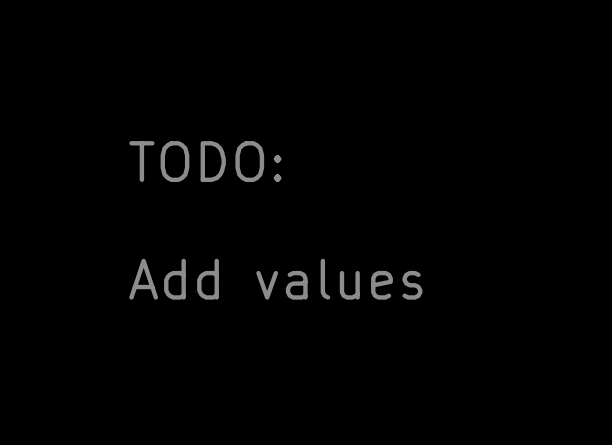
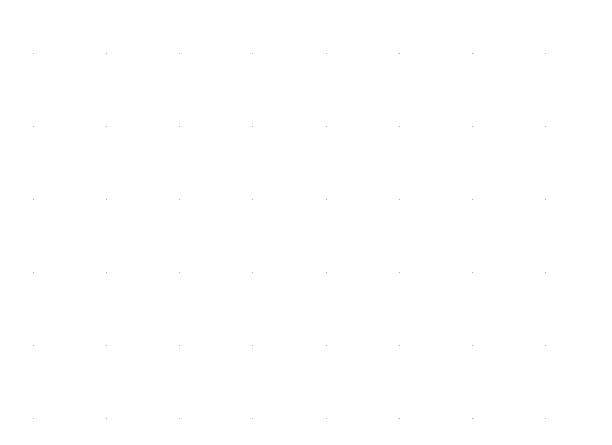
text: TODO: (205, 161) -> none
text: Add values (275, 279) -> none

